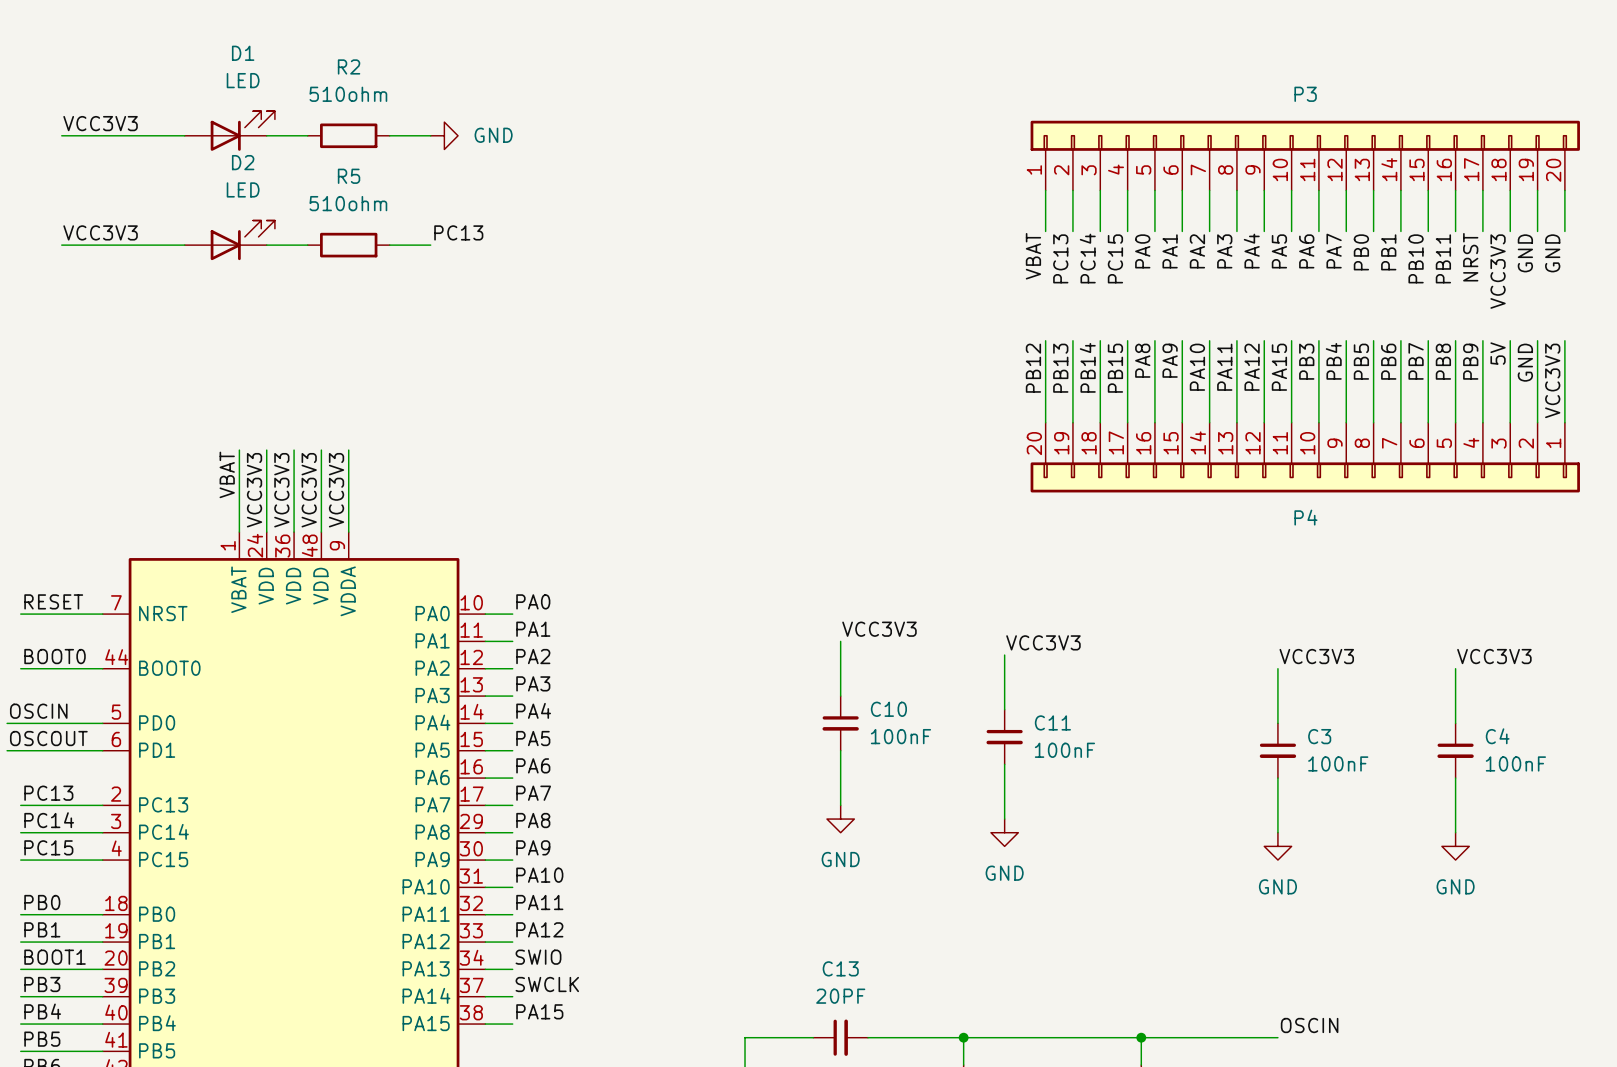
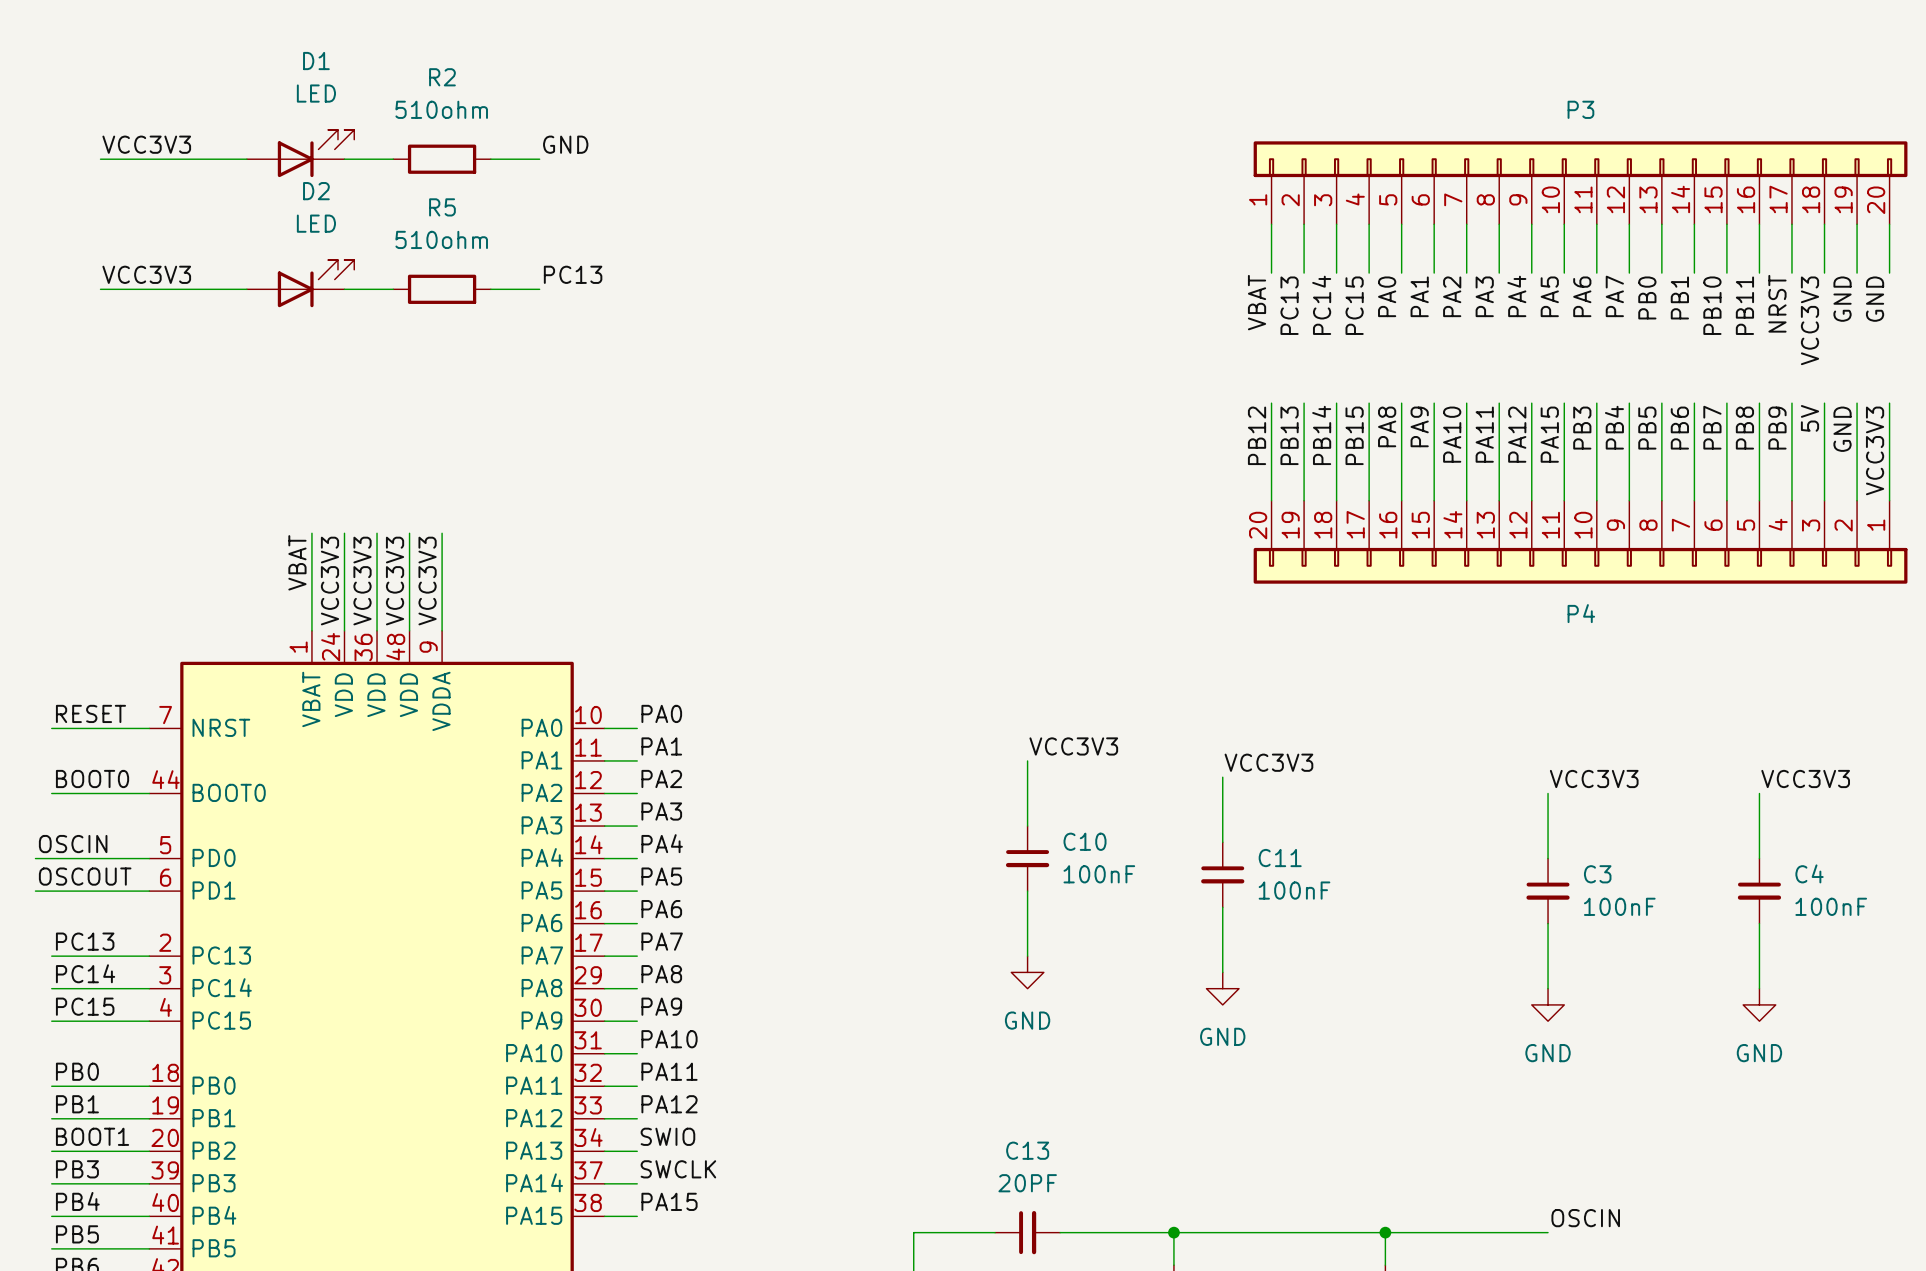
label: none -> GND (565, 144)
power symbol: GND (444, 135) -> none

